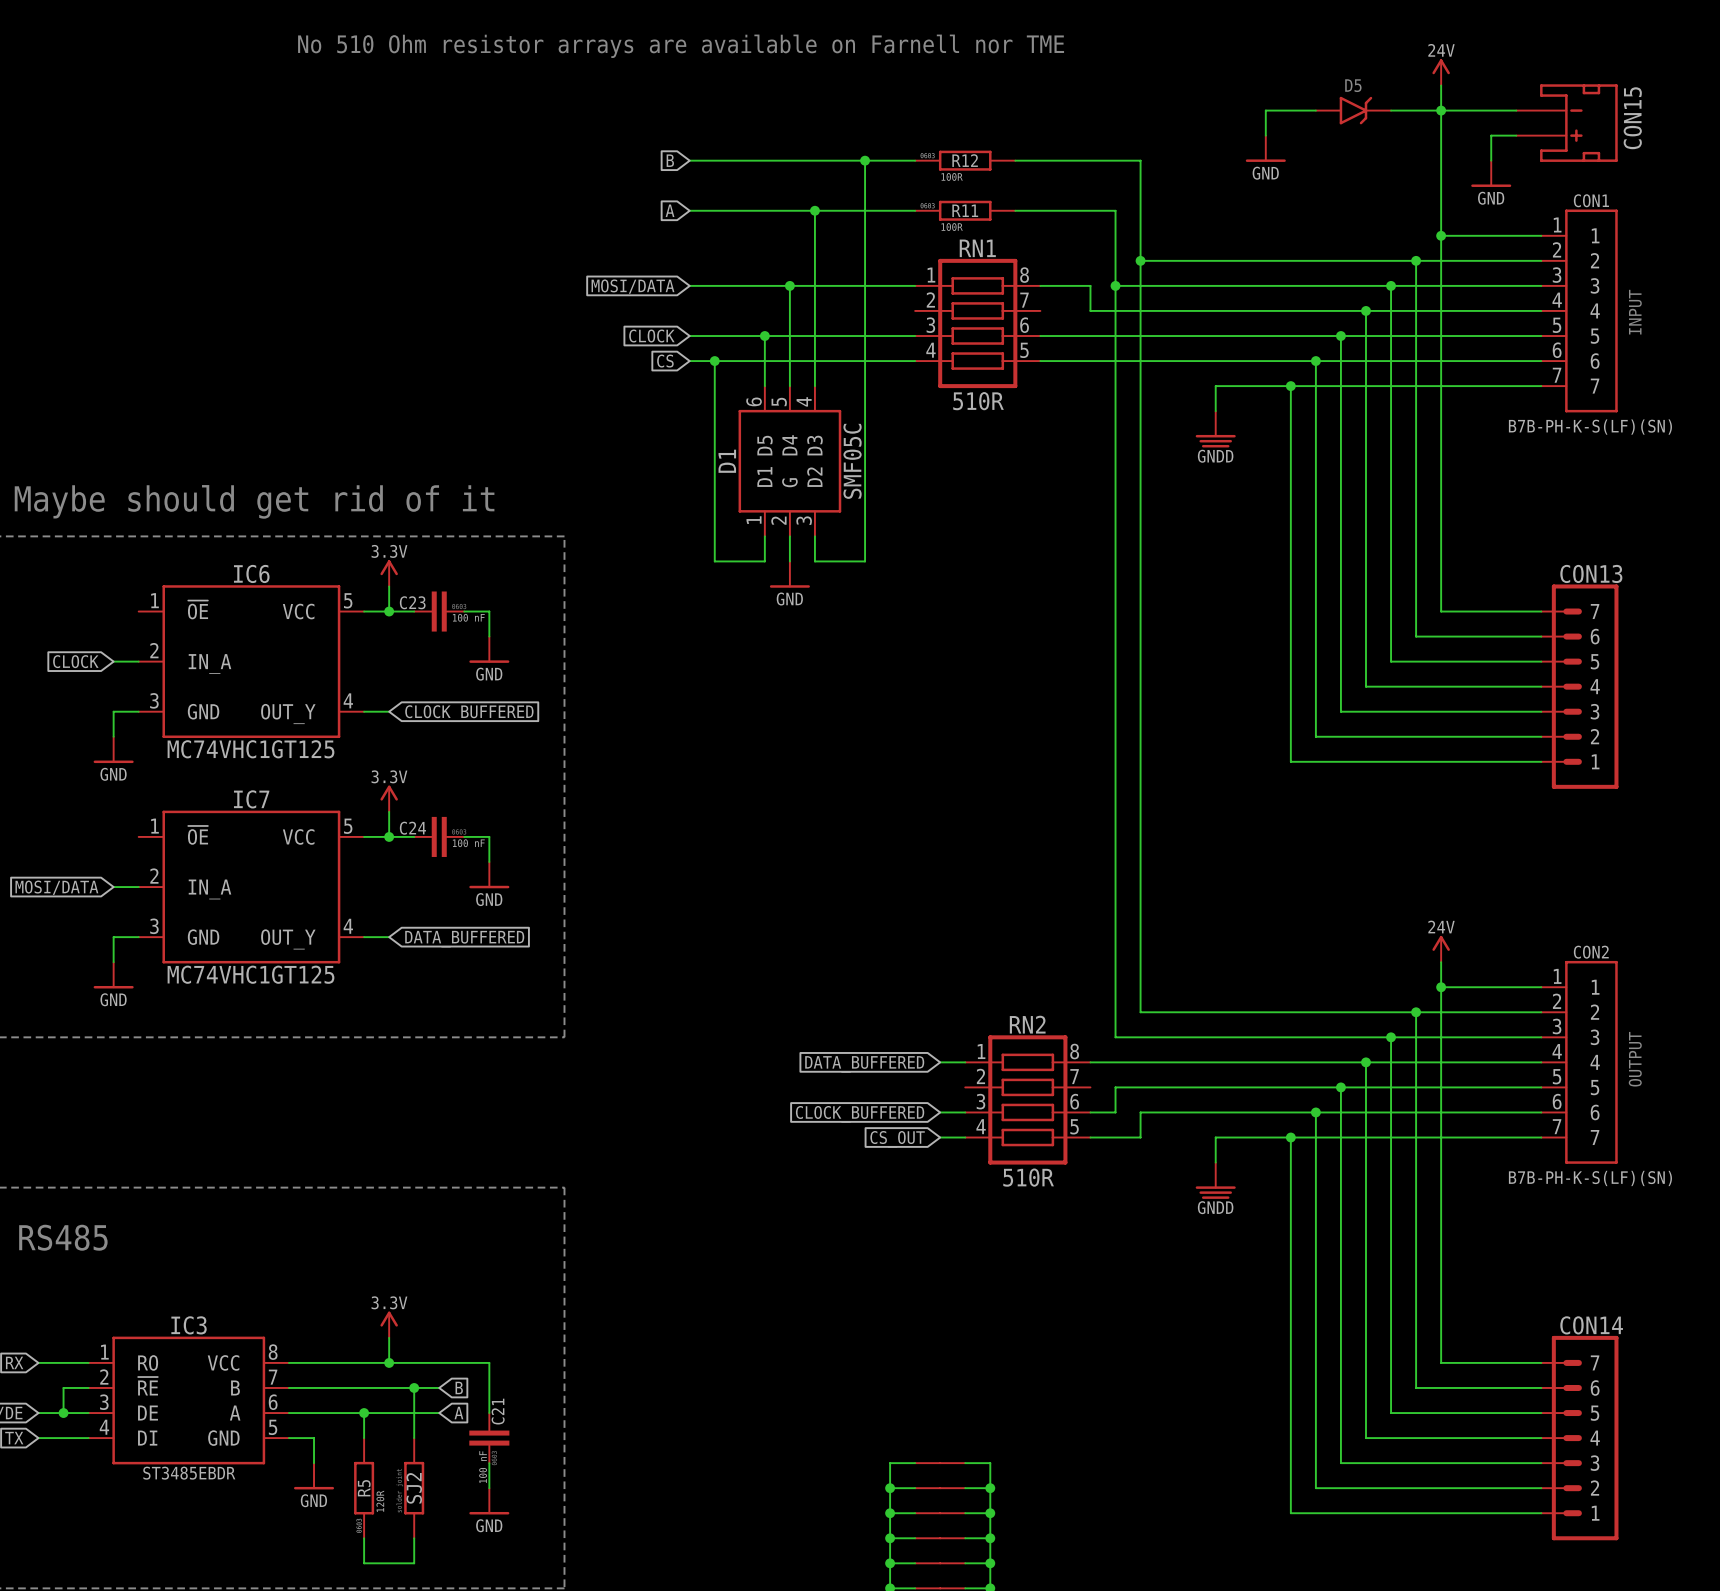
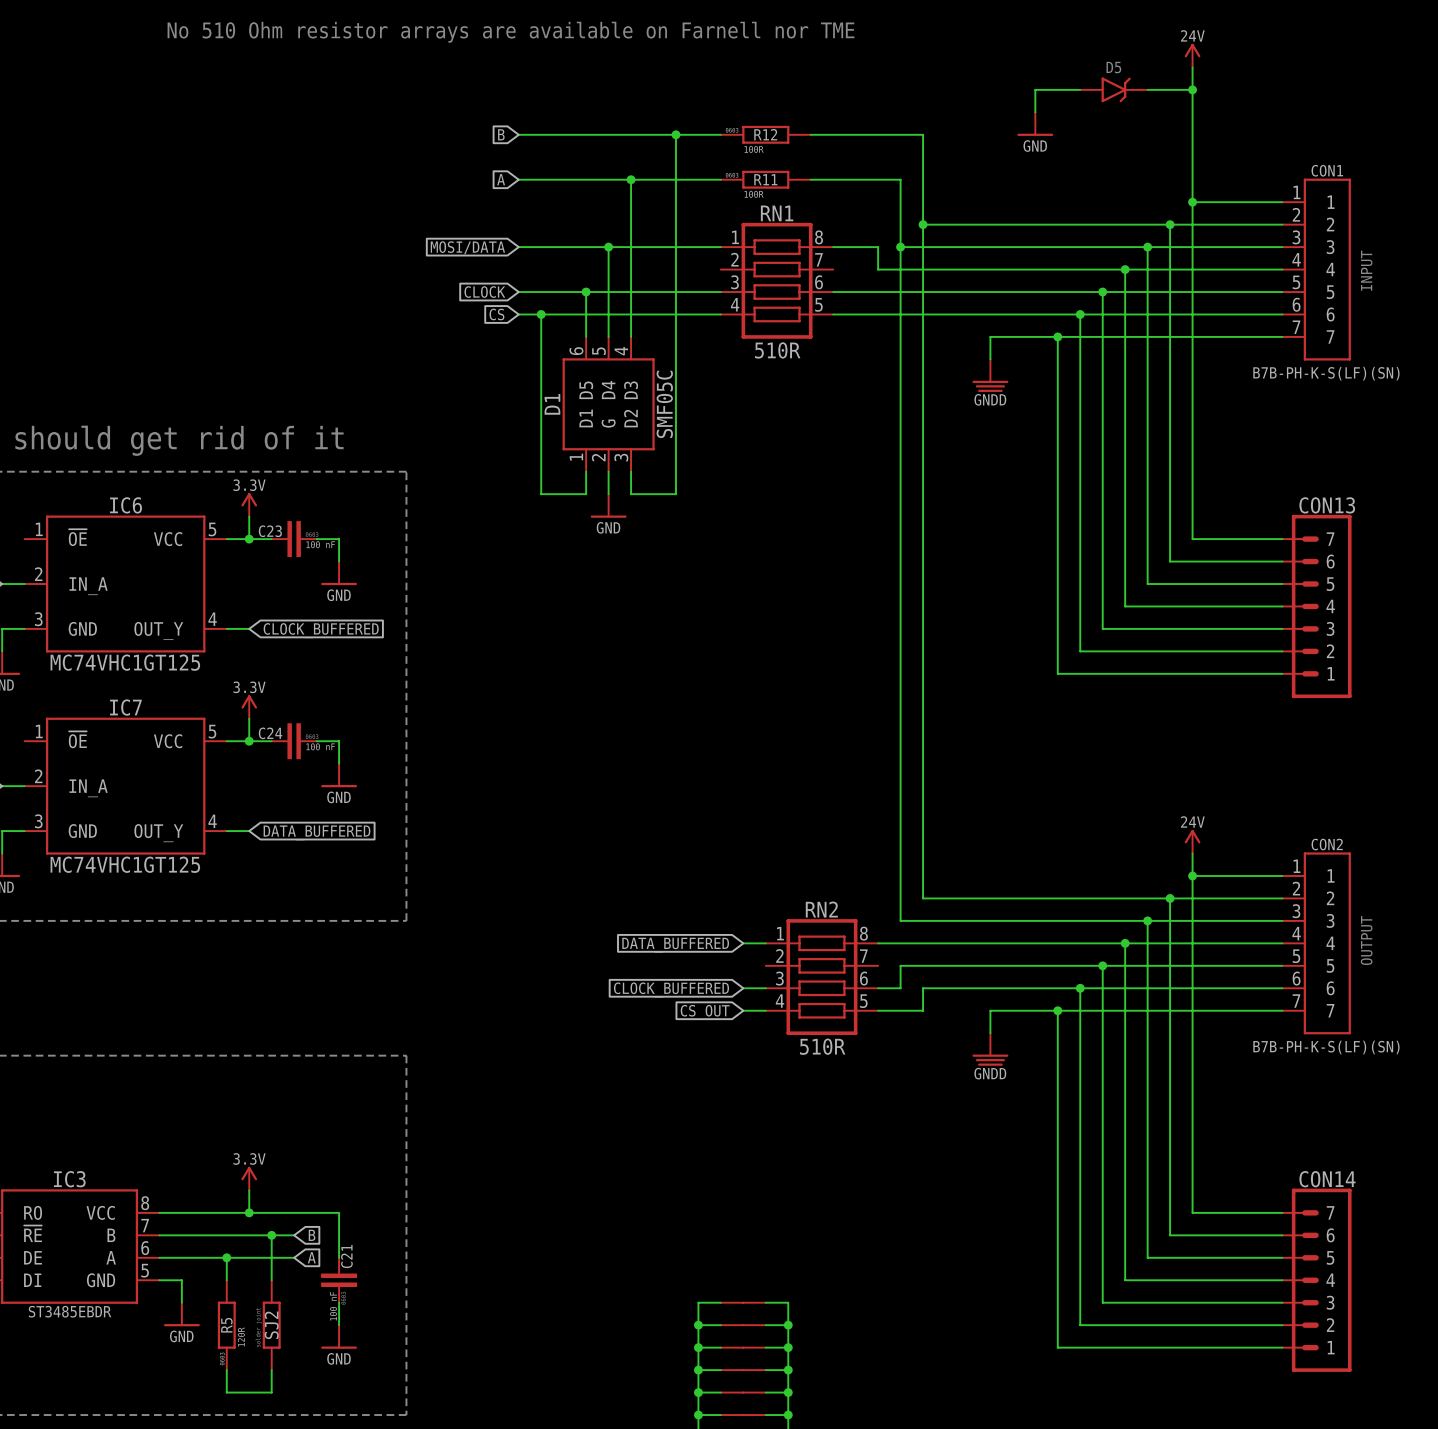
wire: (1441, 110) (1516, 110) -> none
CON15: (1567, 123) -> none
wire: (1516, 135) (1491, 135) (1491, 160) -> none
power symbol: GND (1491, 173) -> none

